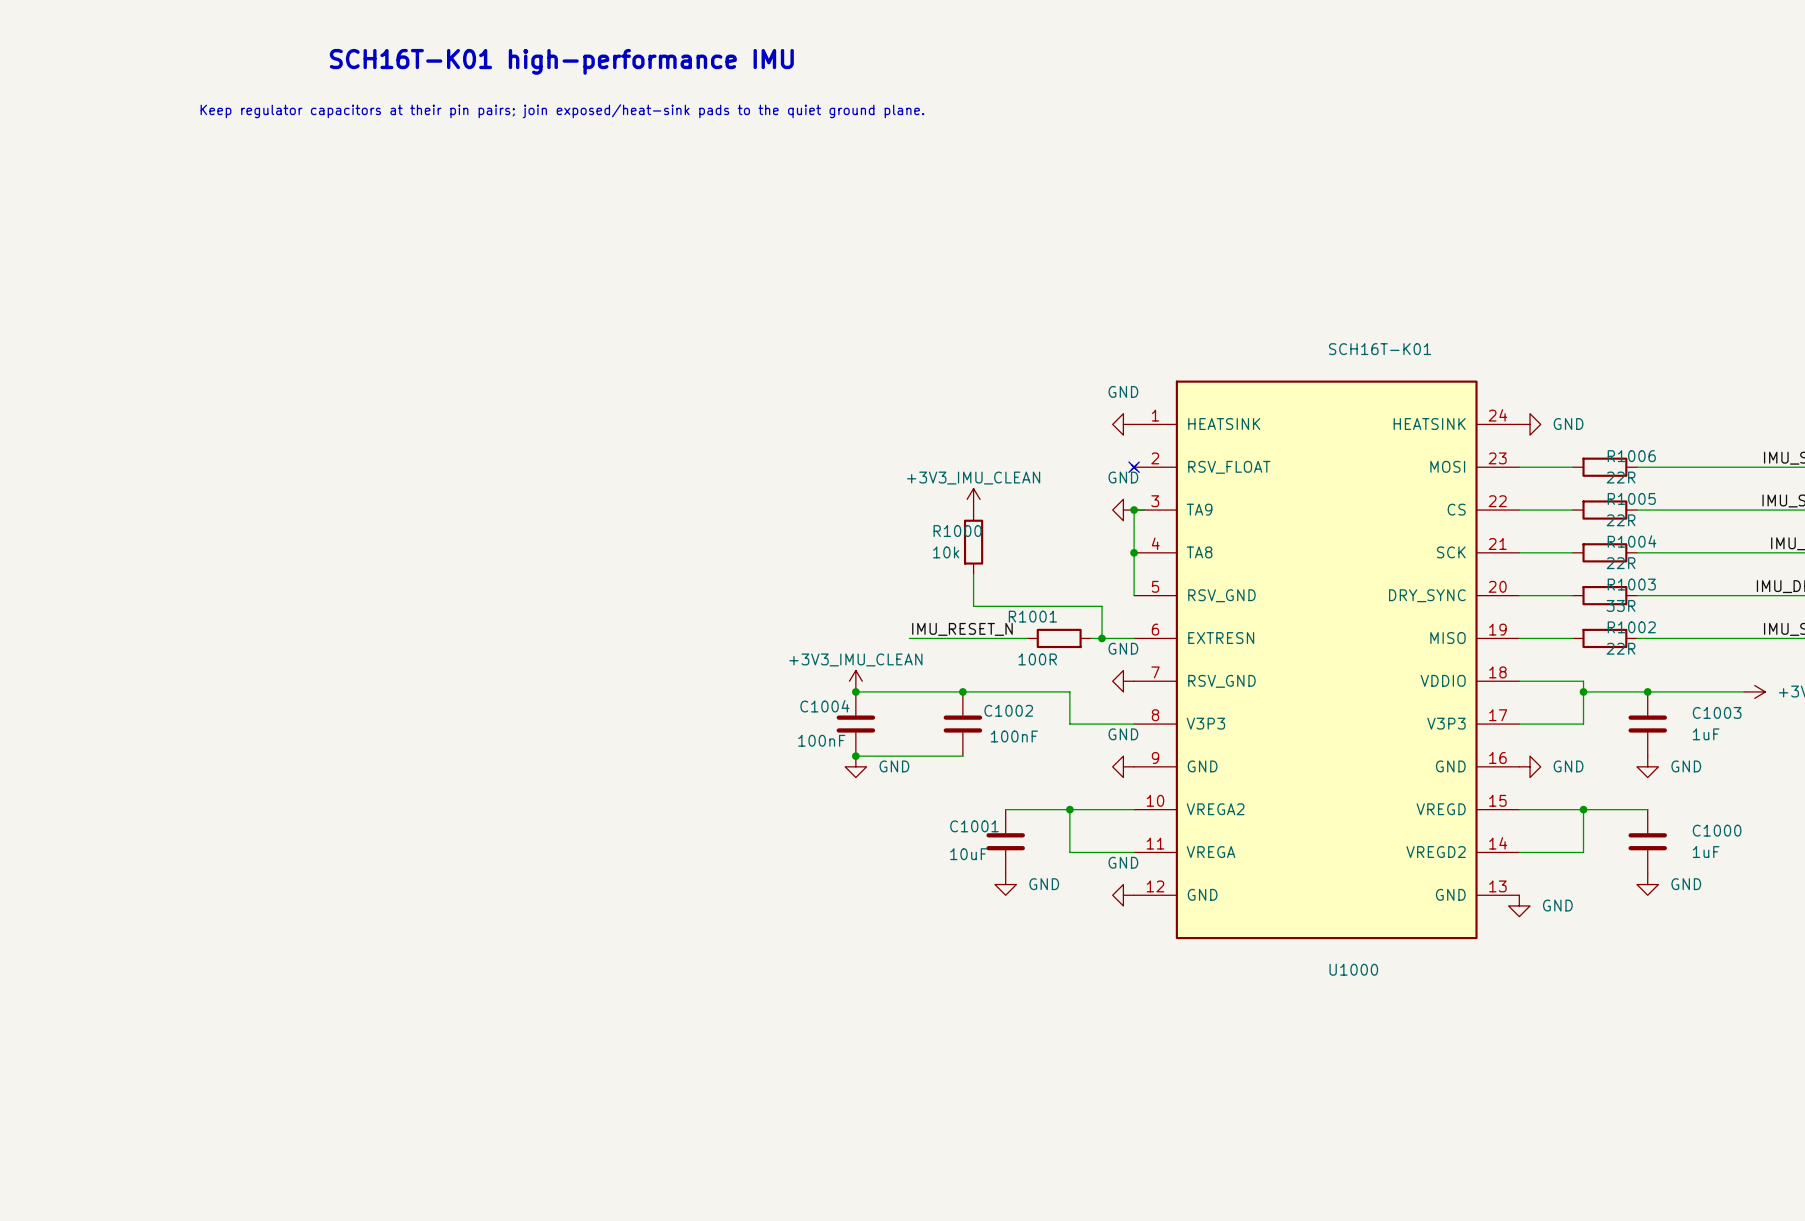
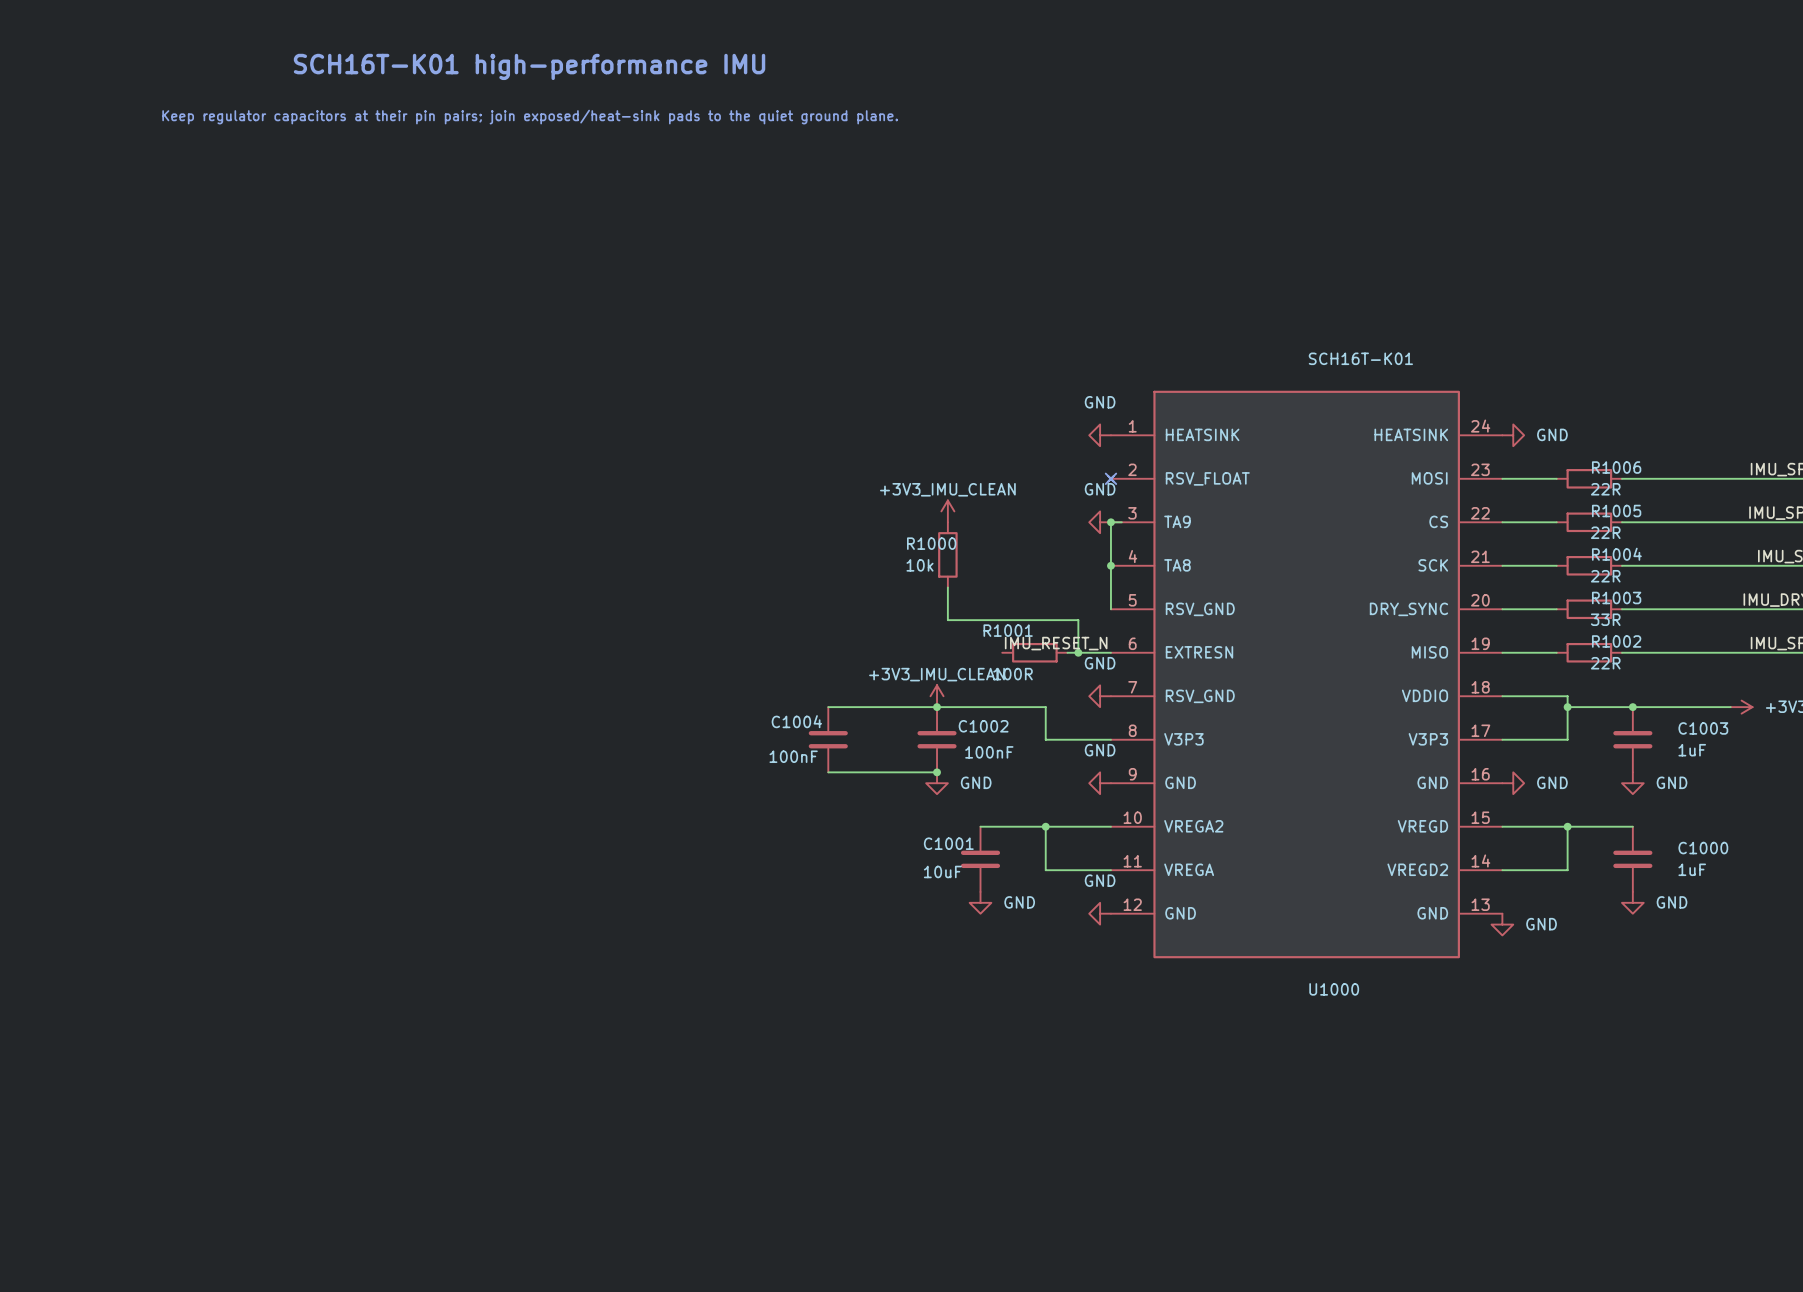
label position: IMU_RESET_N (962, 629) -> IMU_RESET_N (1056, 643)
wire: (909, 638) (1027, 638) -> none
power symbol position: +3V3_IMU_CLEAN (855, 681) -> +3V3_IMU_CLEAN (937, 696)
junction: (855, 691) -> none
junction: (855, 756) -> none
junction: none -> (937, 772)
power symbol position: GND (855, 766) -> GND (937, 783)

